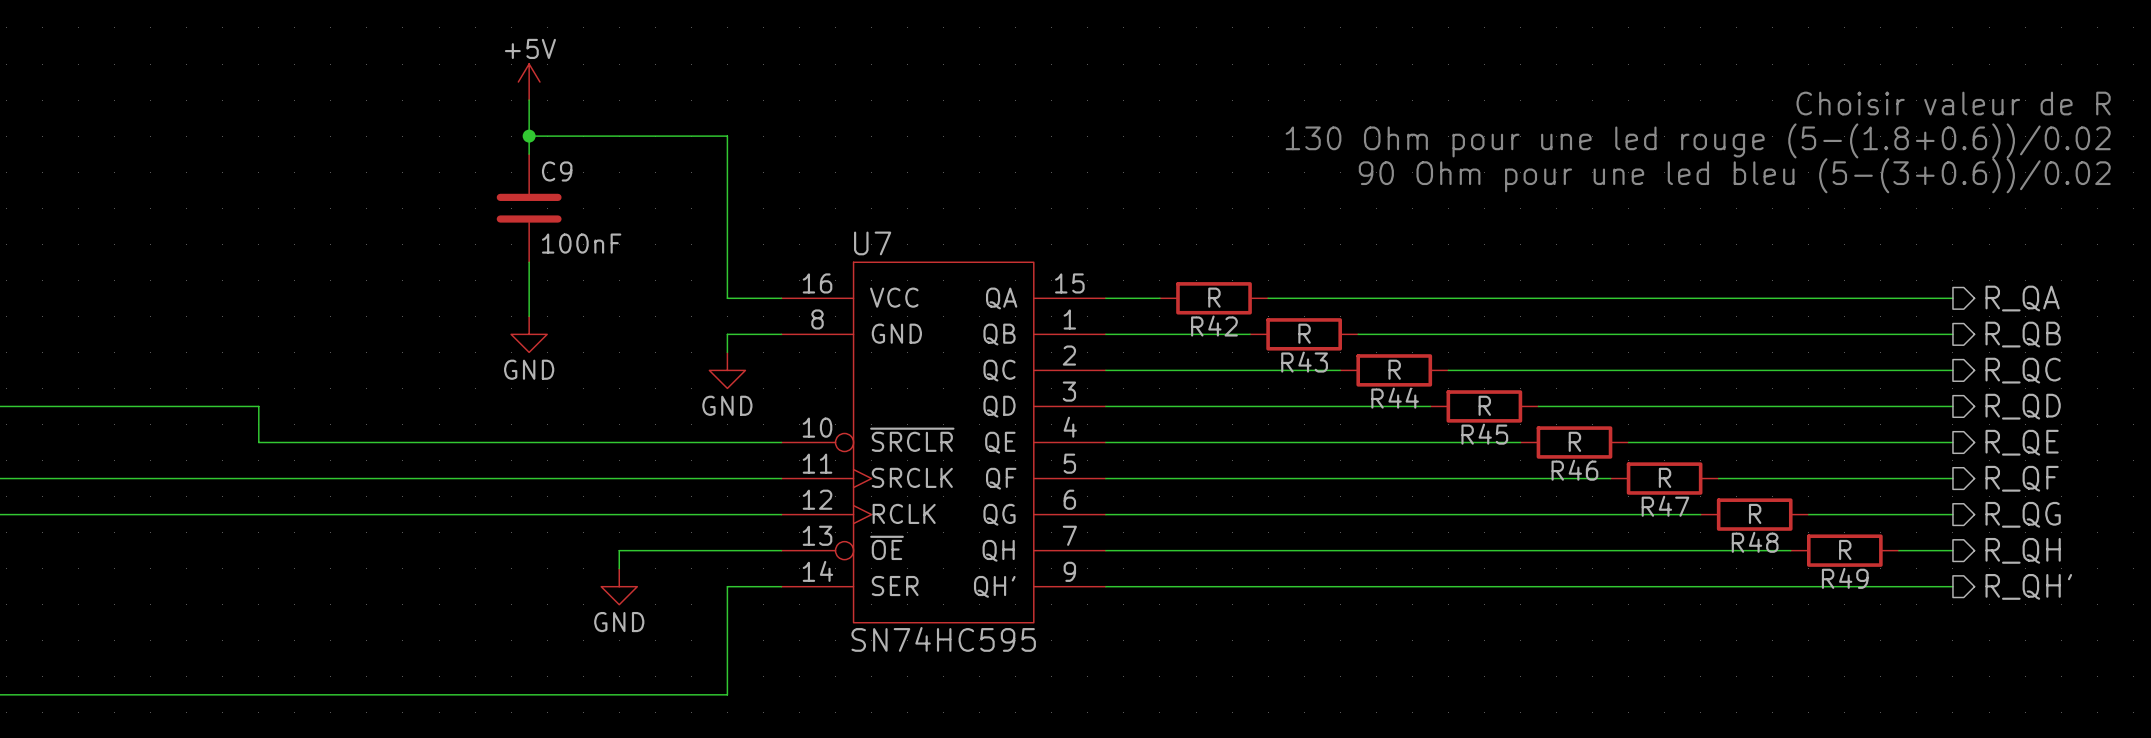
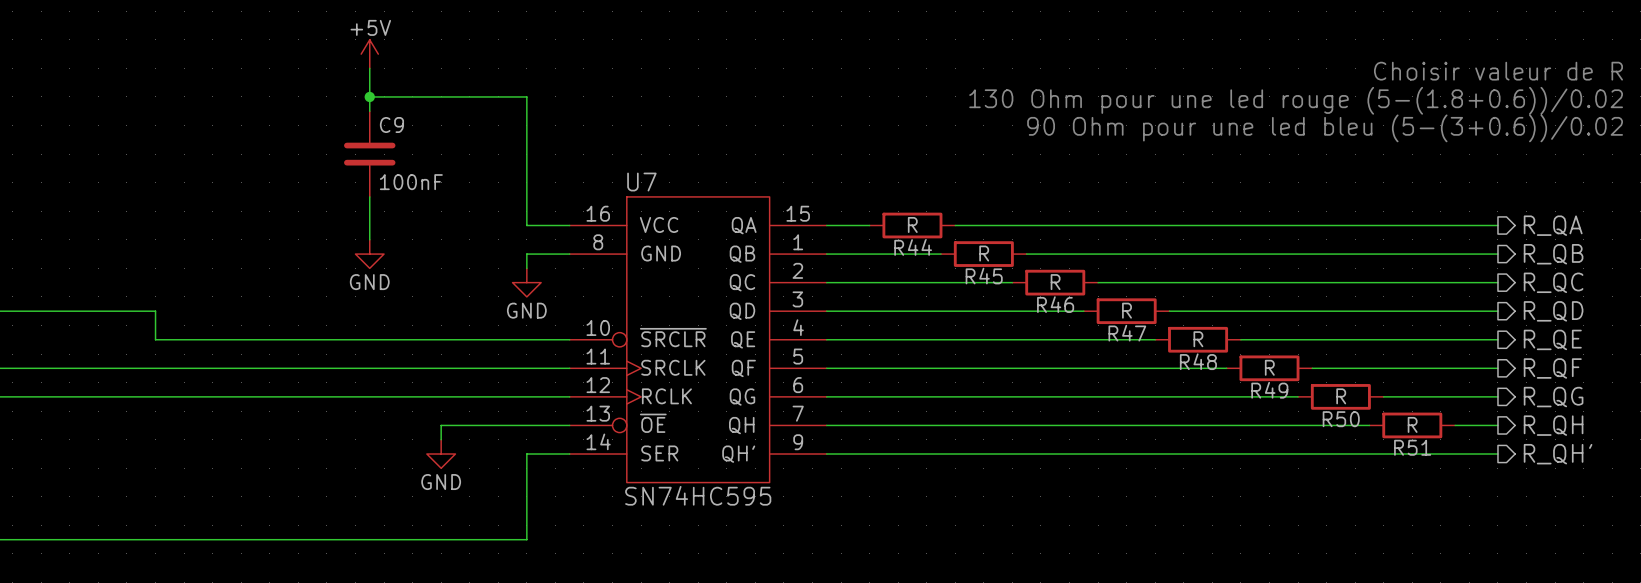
R42 name: R42 (1214, 326) -> R44 (913, 247)
R43 name: R43 (1304, 362) -> R45 (984, 276)
R44 name: R44 (1395, 398) -> R46 (1055, 304)
R45 name: R45 (1484, 434) -> R47 (1127, 333)
R46 name: R46 (1574, 470) -> R48 (1198, 361)
R47 name: R47 (1665, 506) -> R49 (1269, 390)
R48 name: R48 (1755, 542) -> R50 (1341, 419)
R49 name: R49 (1845, 578) -> R51 (1412, 447)

